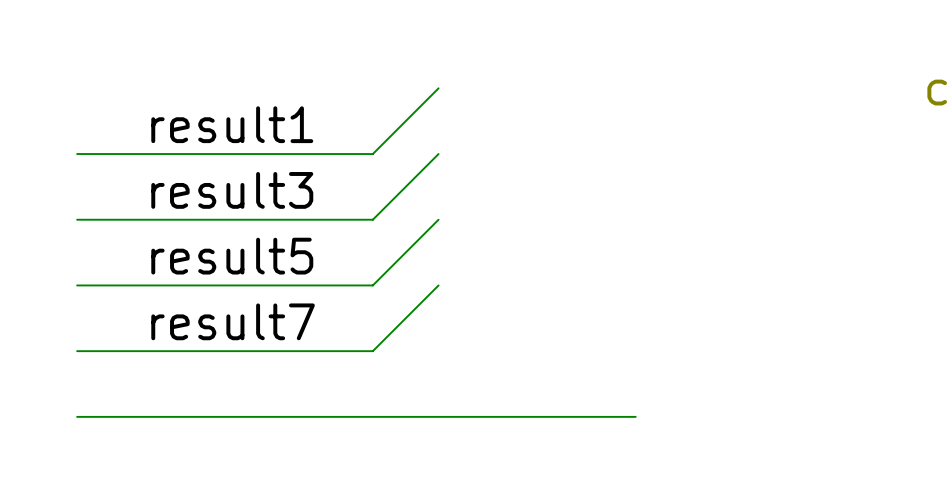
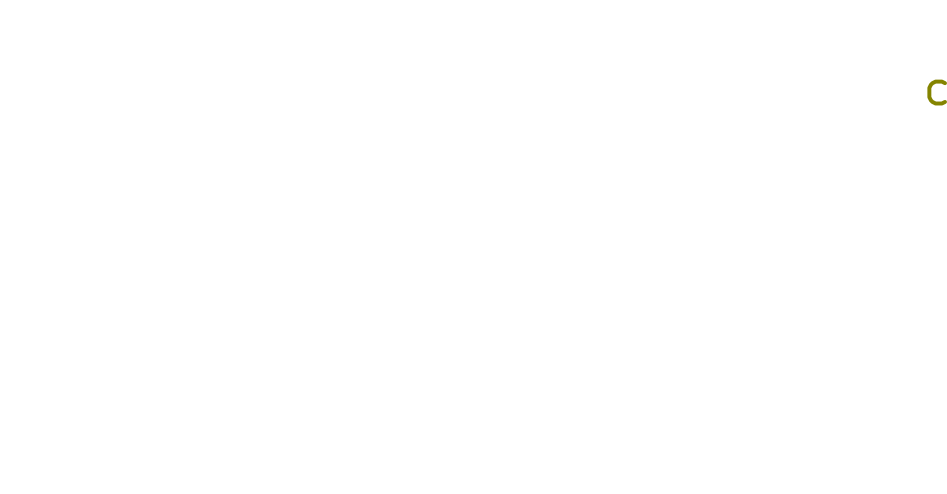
wire: (438, 88) (372, 154) (77, 154) -> none
label: result1 (232, 124) -> none
wire: (438, 154) (372, 219) (77, 219) -> none
label: result3 (232, 190) -> none
wire: (438, 219) (372, 285) (77, 285) -> none
label: result5 (232, 256) -> none
wire: (438, 285) (372, 351) (77, 351) -> none
label: result7 (233, 321) -> none
wire: (77, 416) (635, 416) -> none

